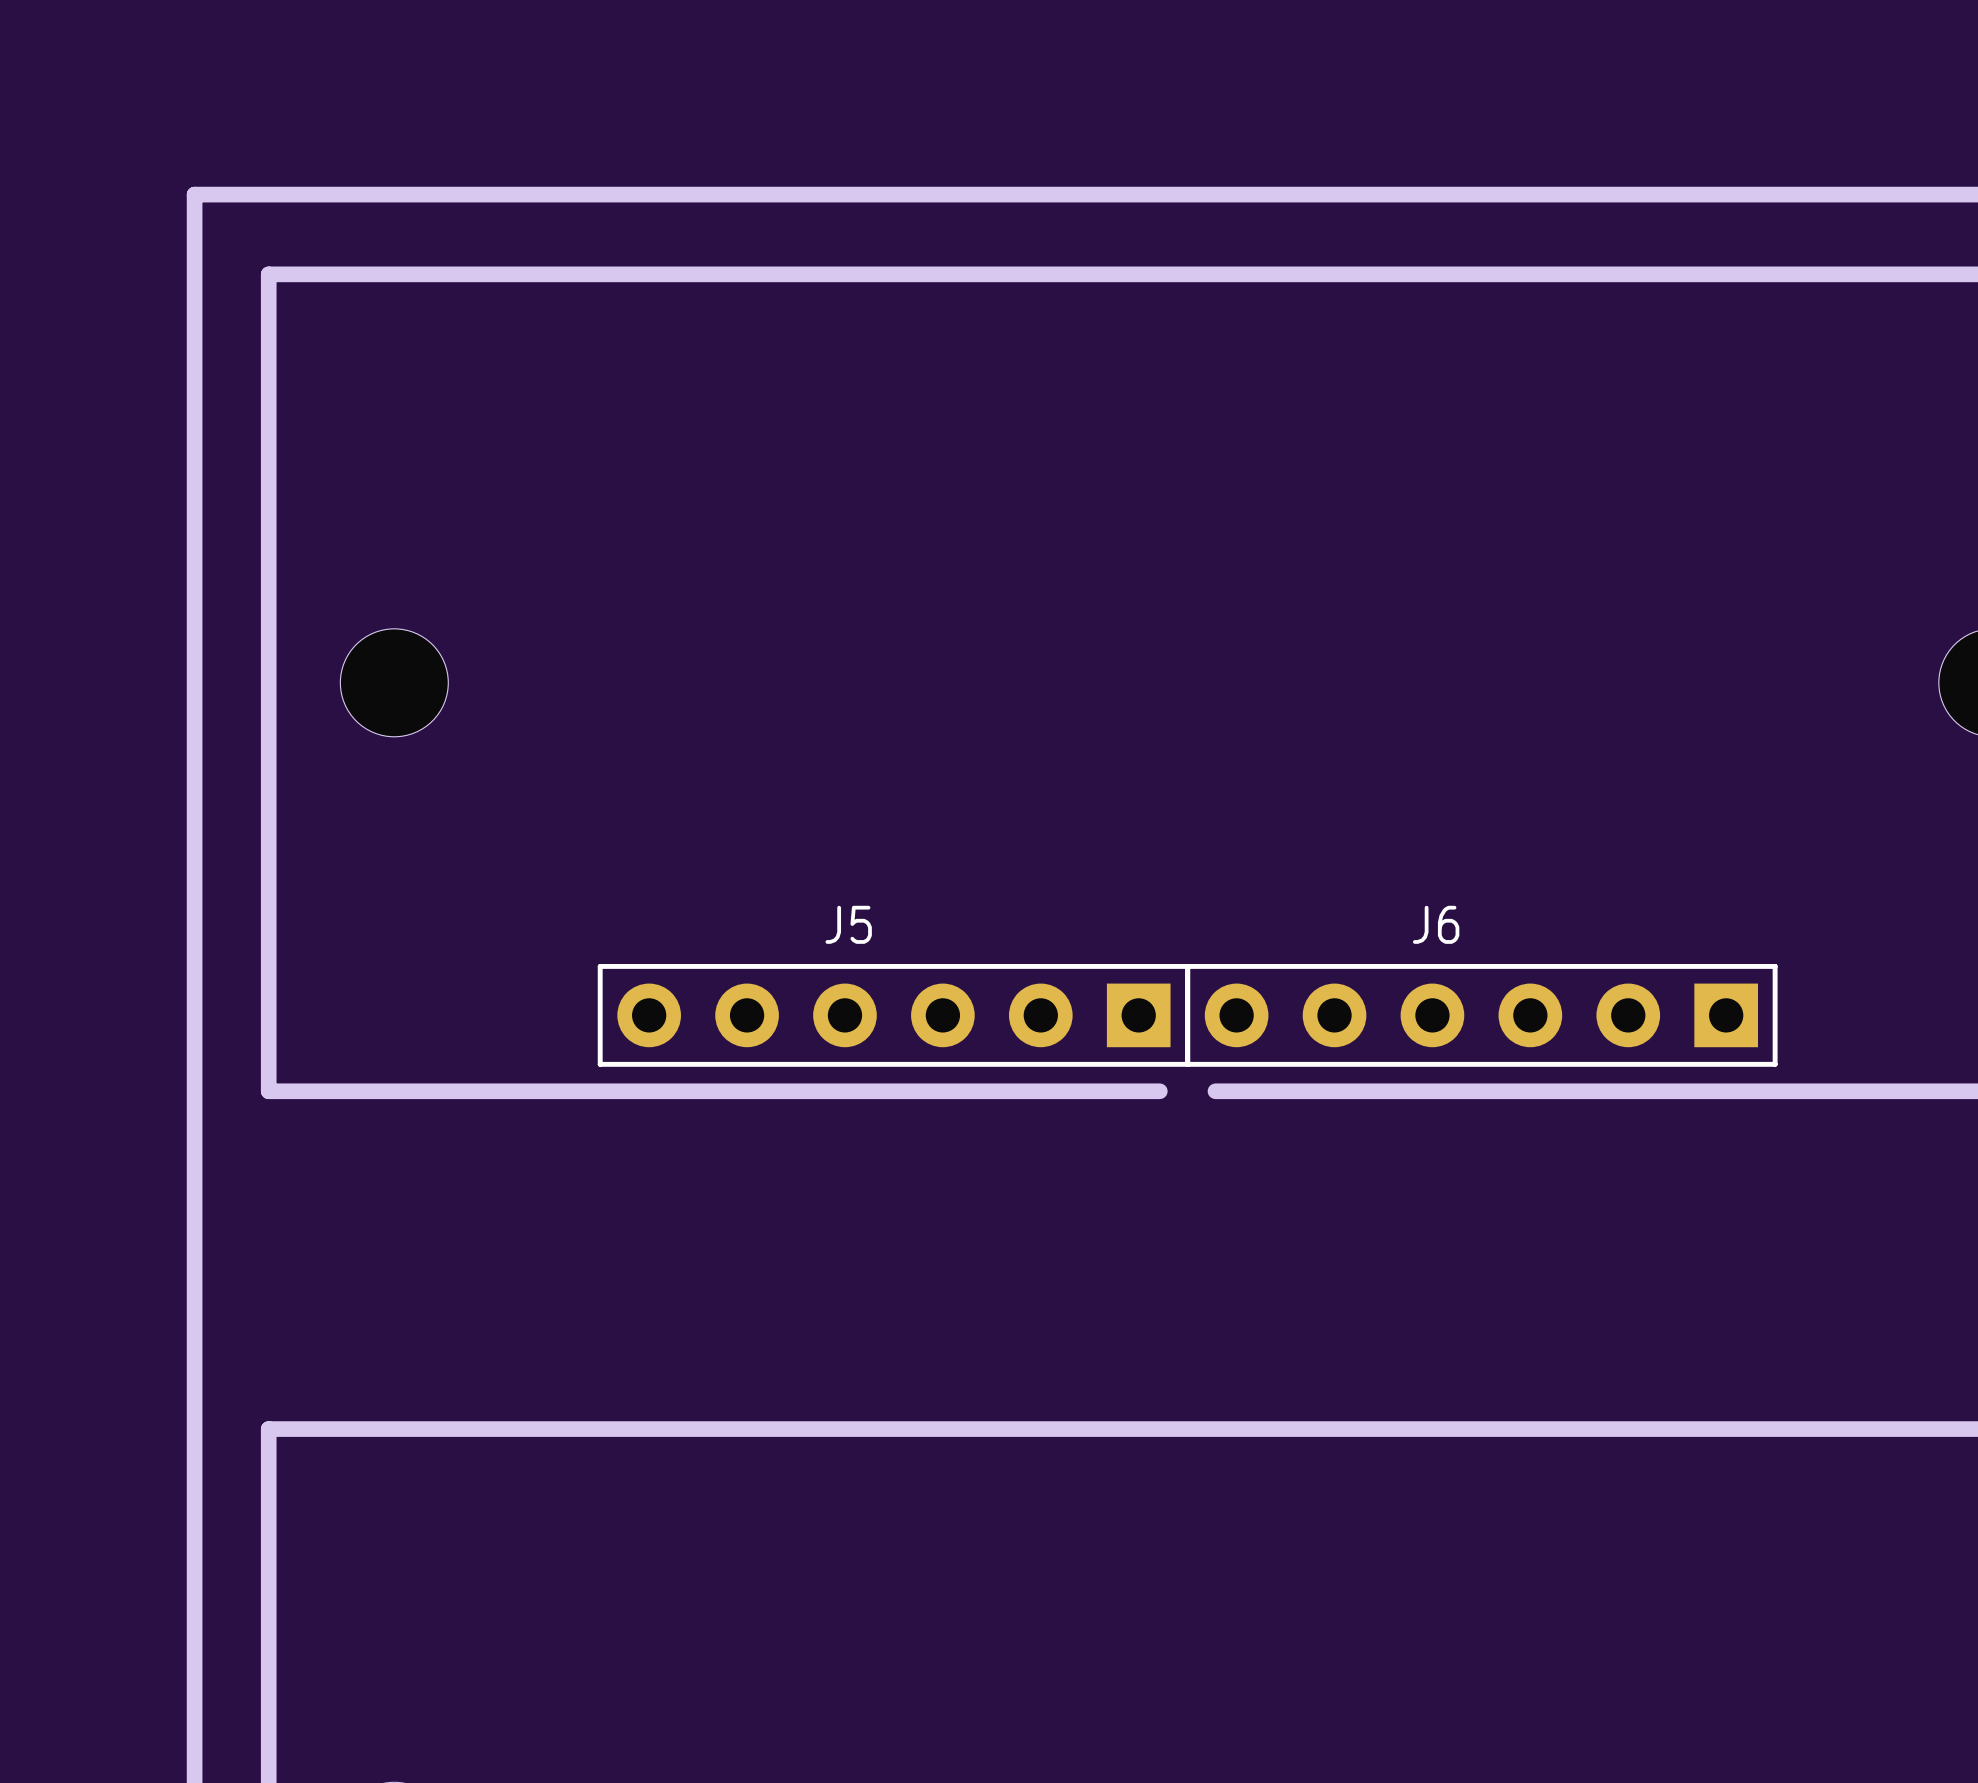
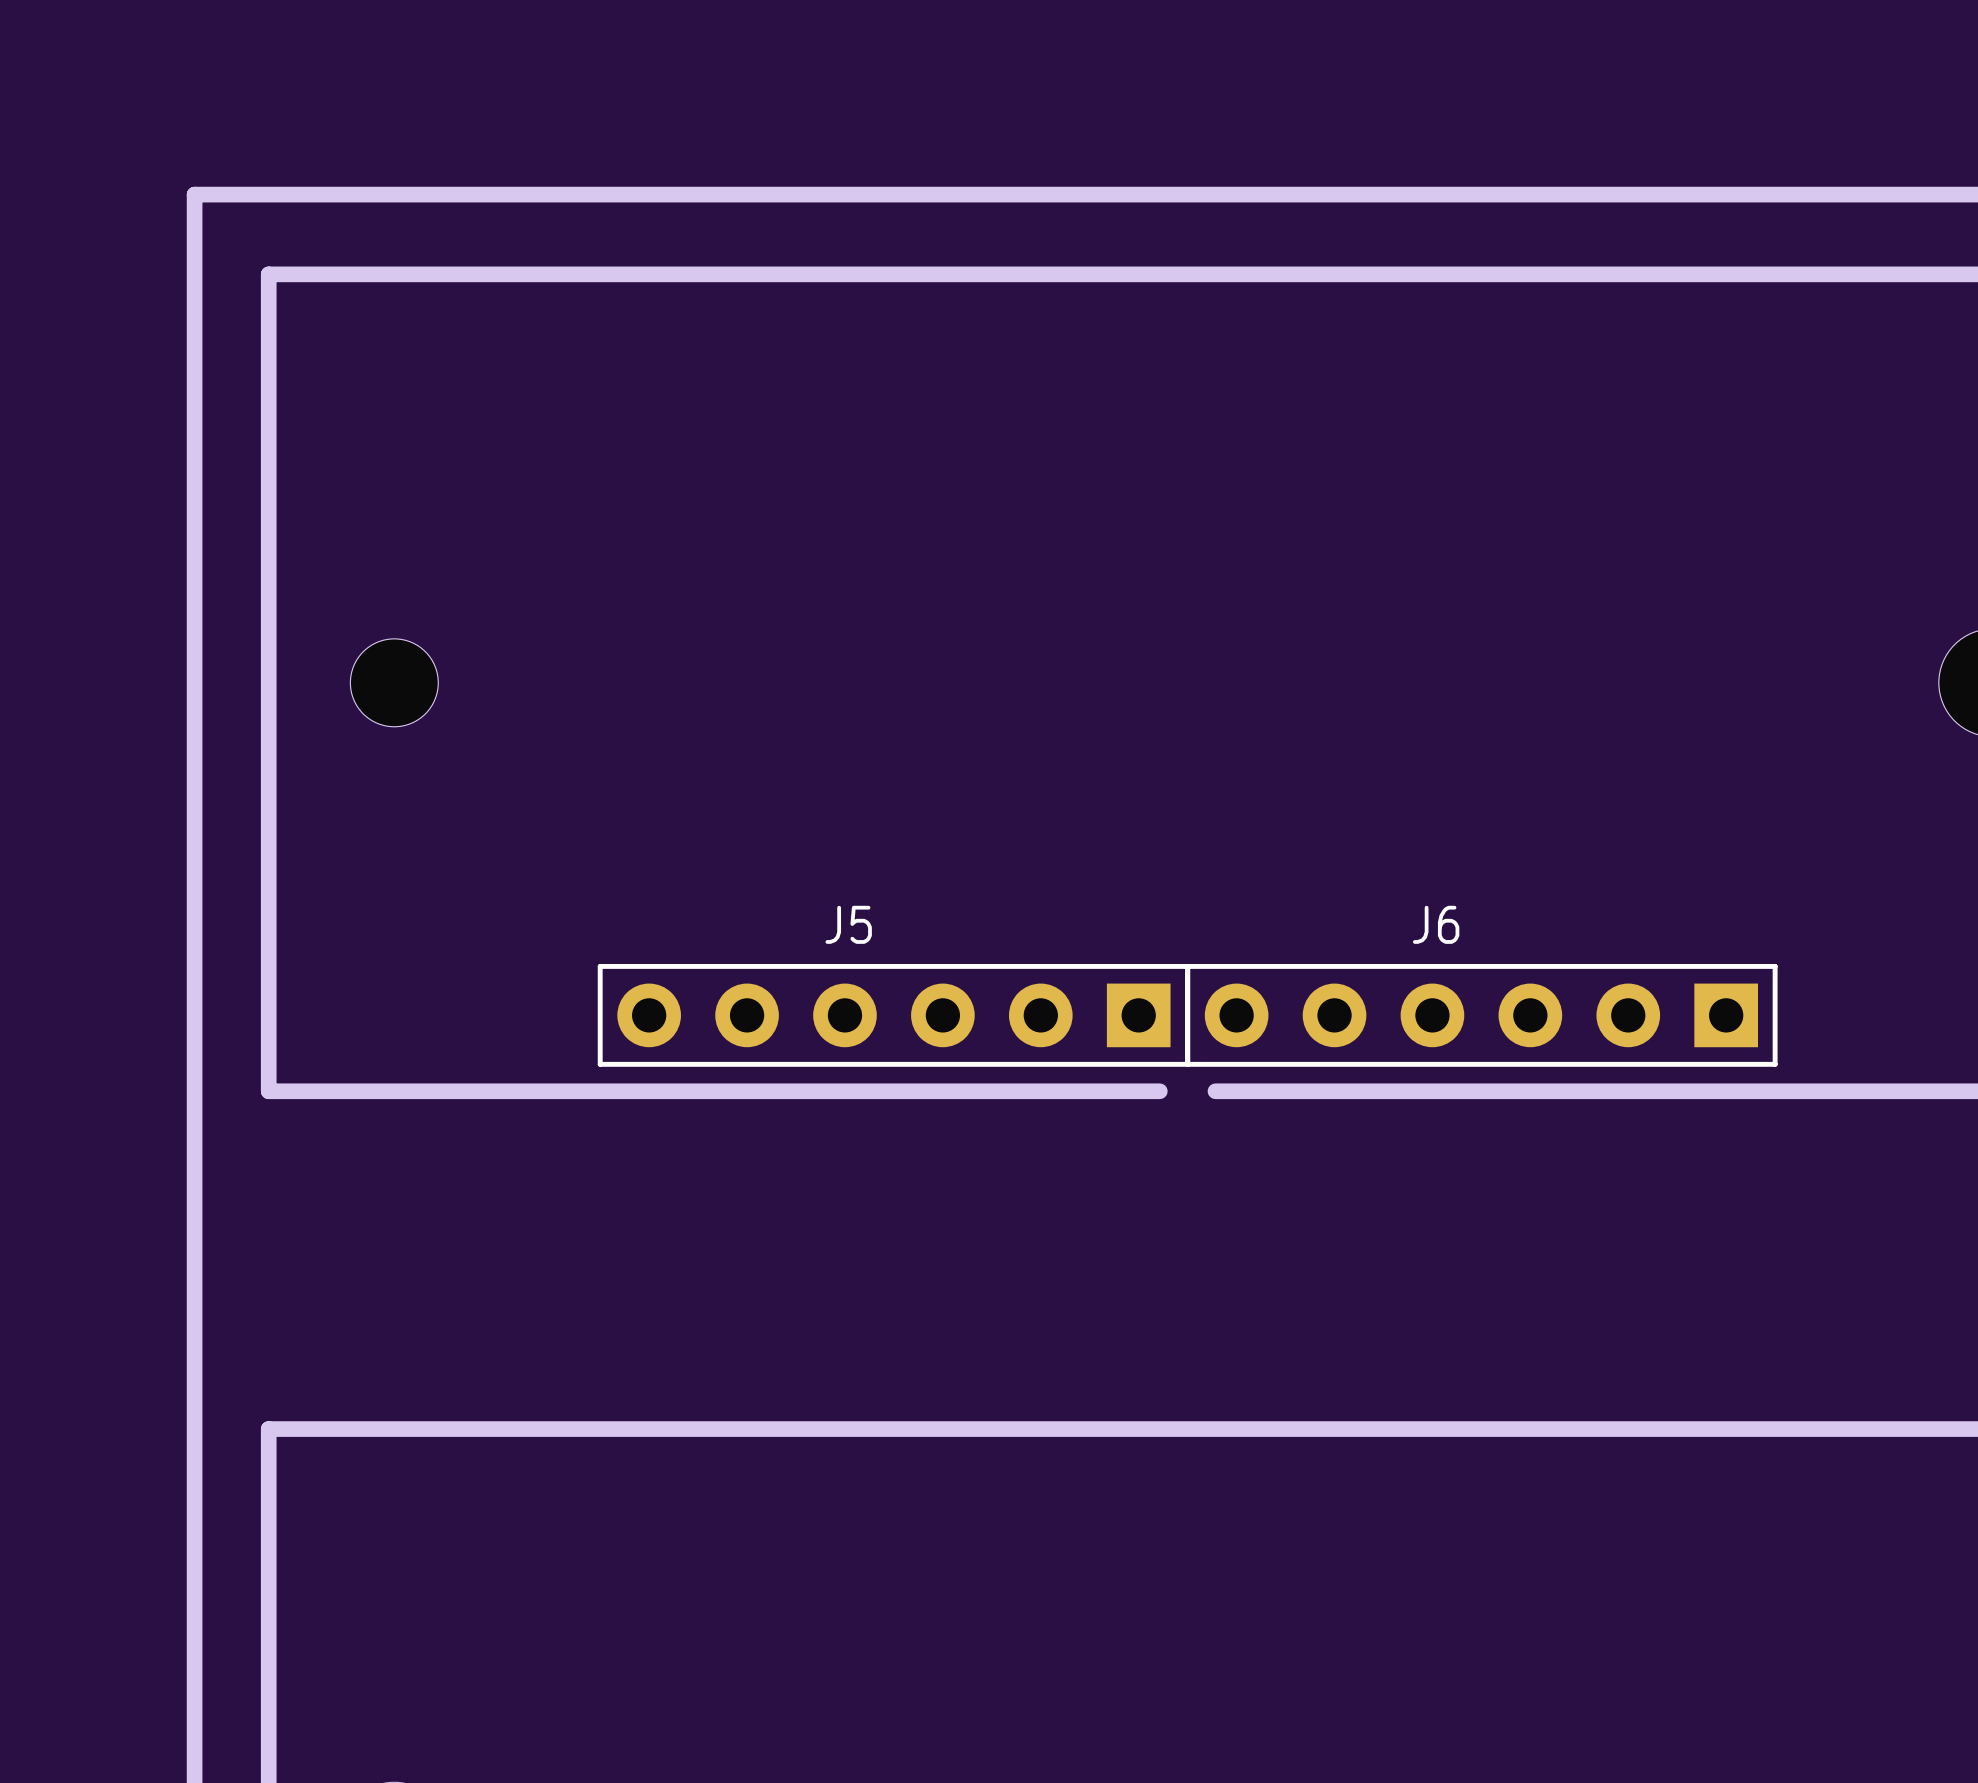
hole size: [340, 628, 449, 737] -> [350, 638, 439, 727]

